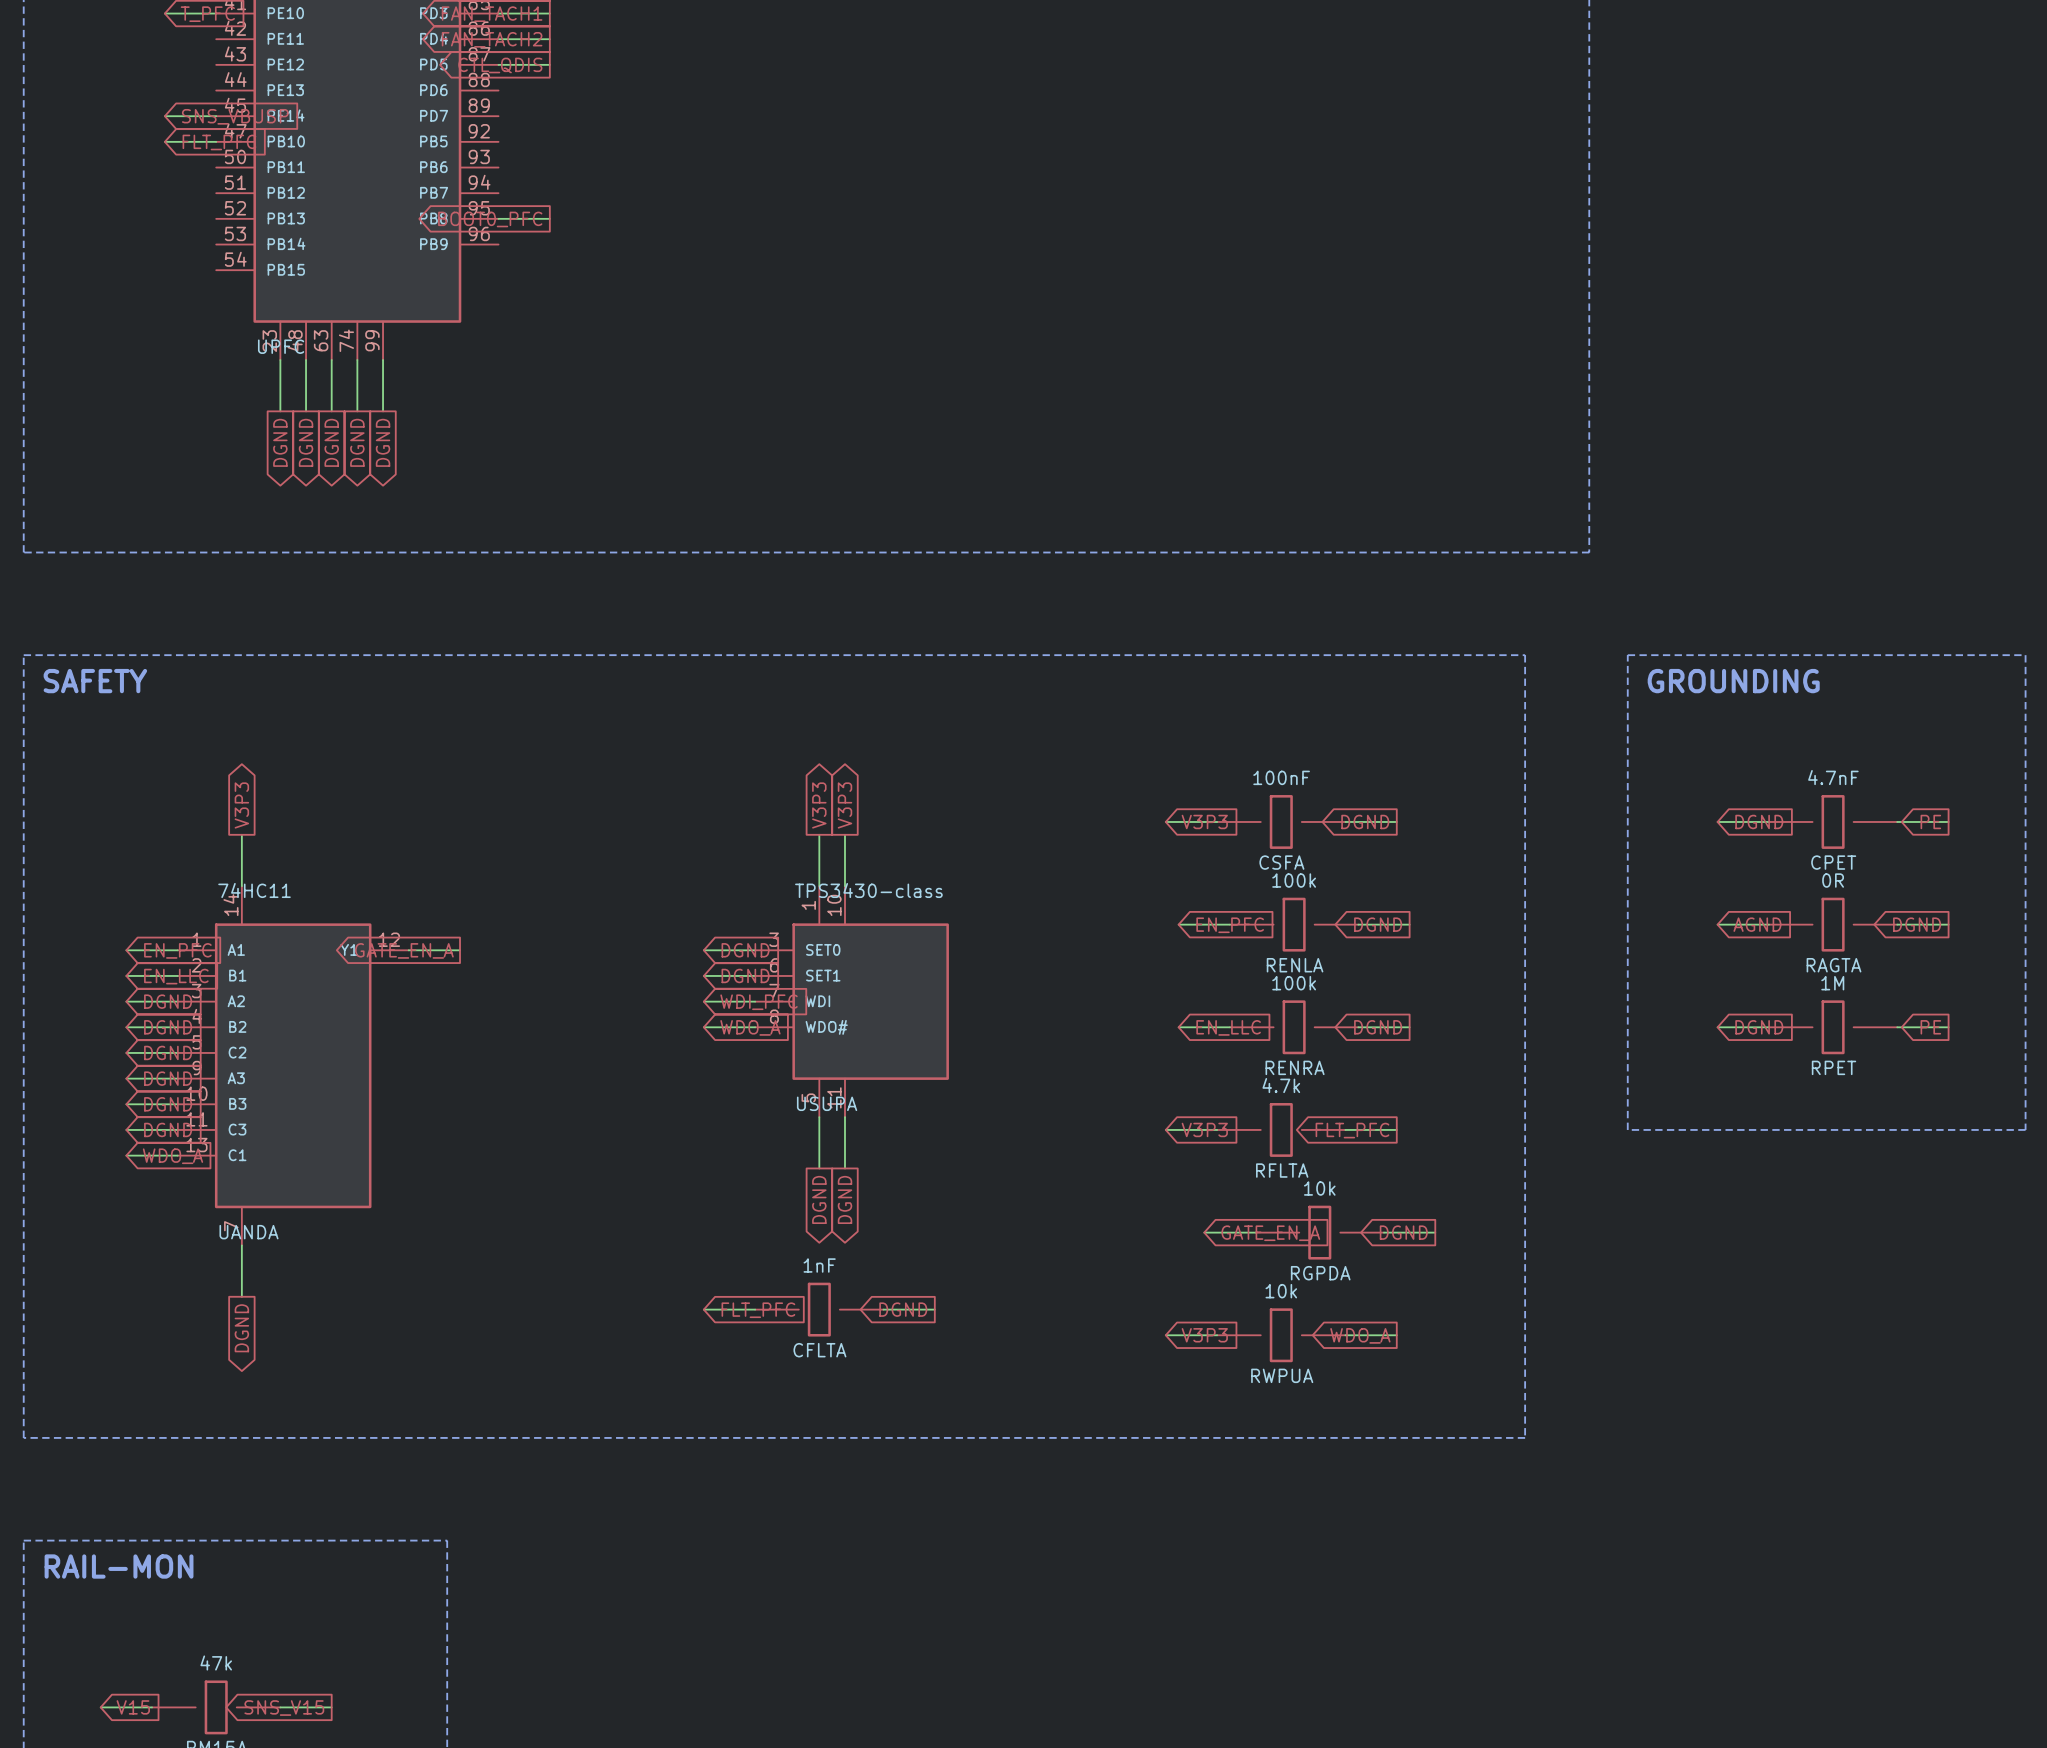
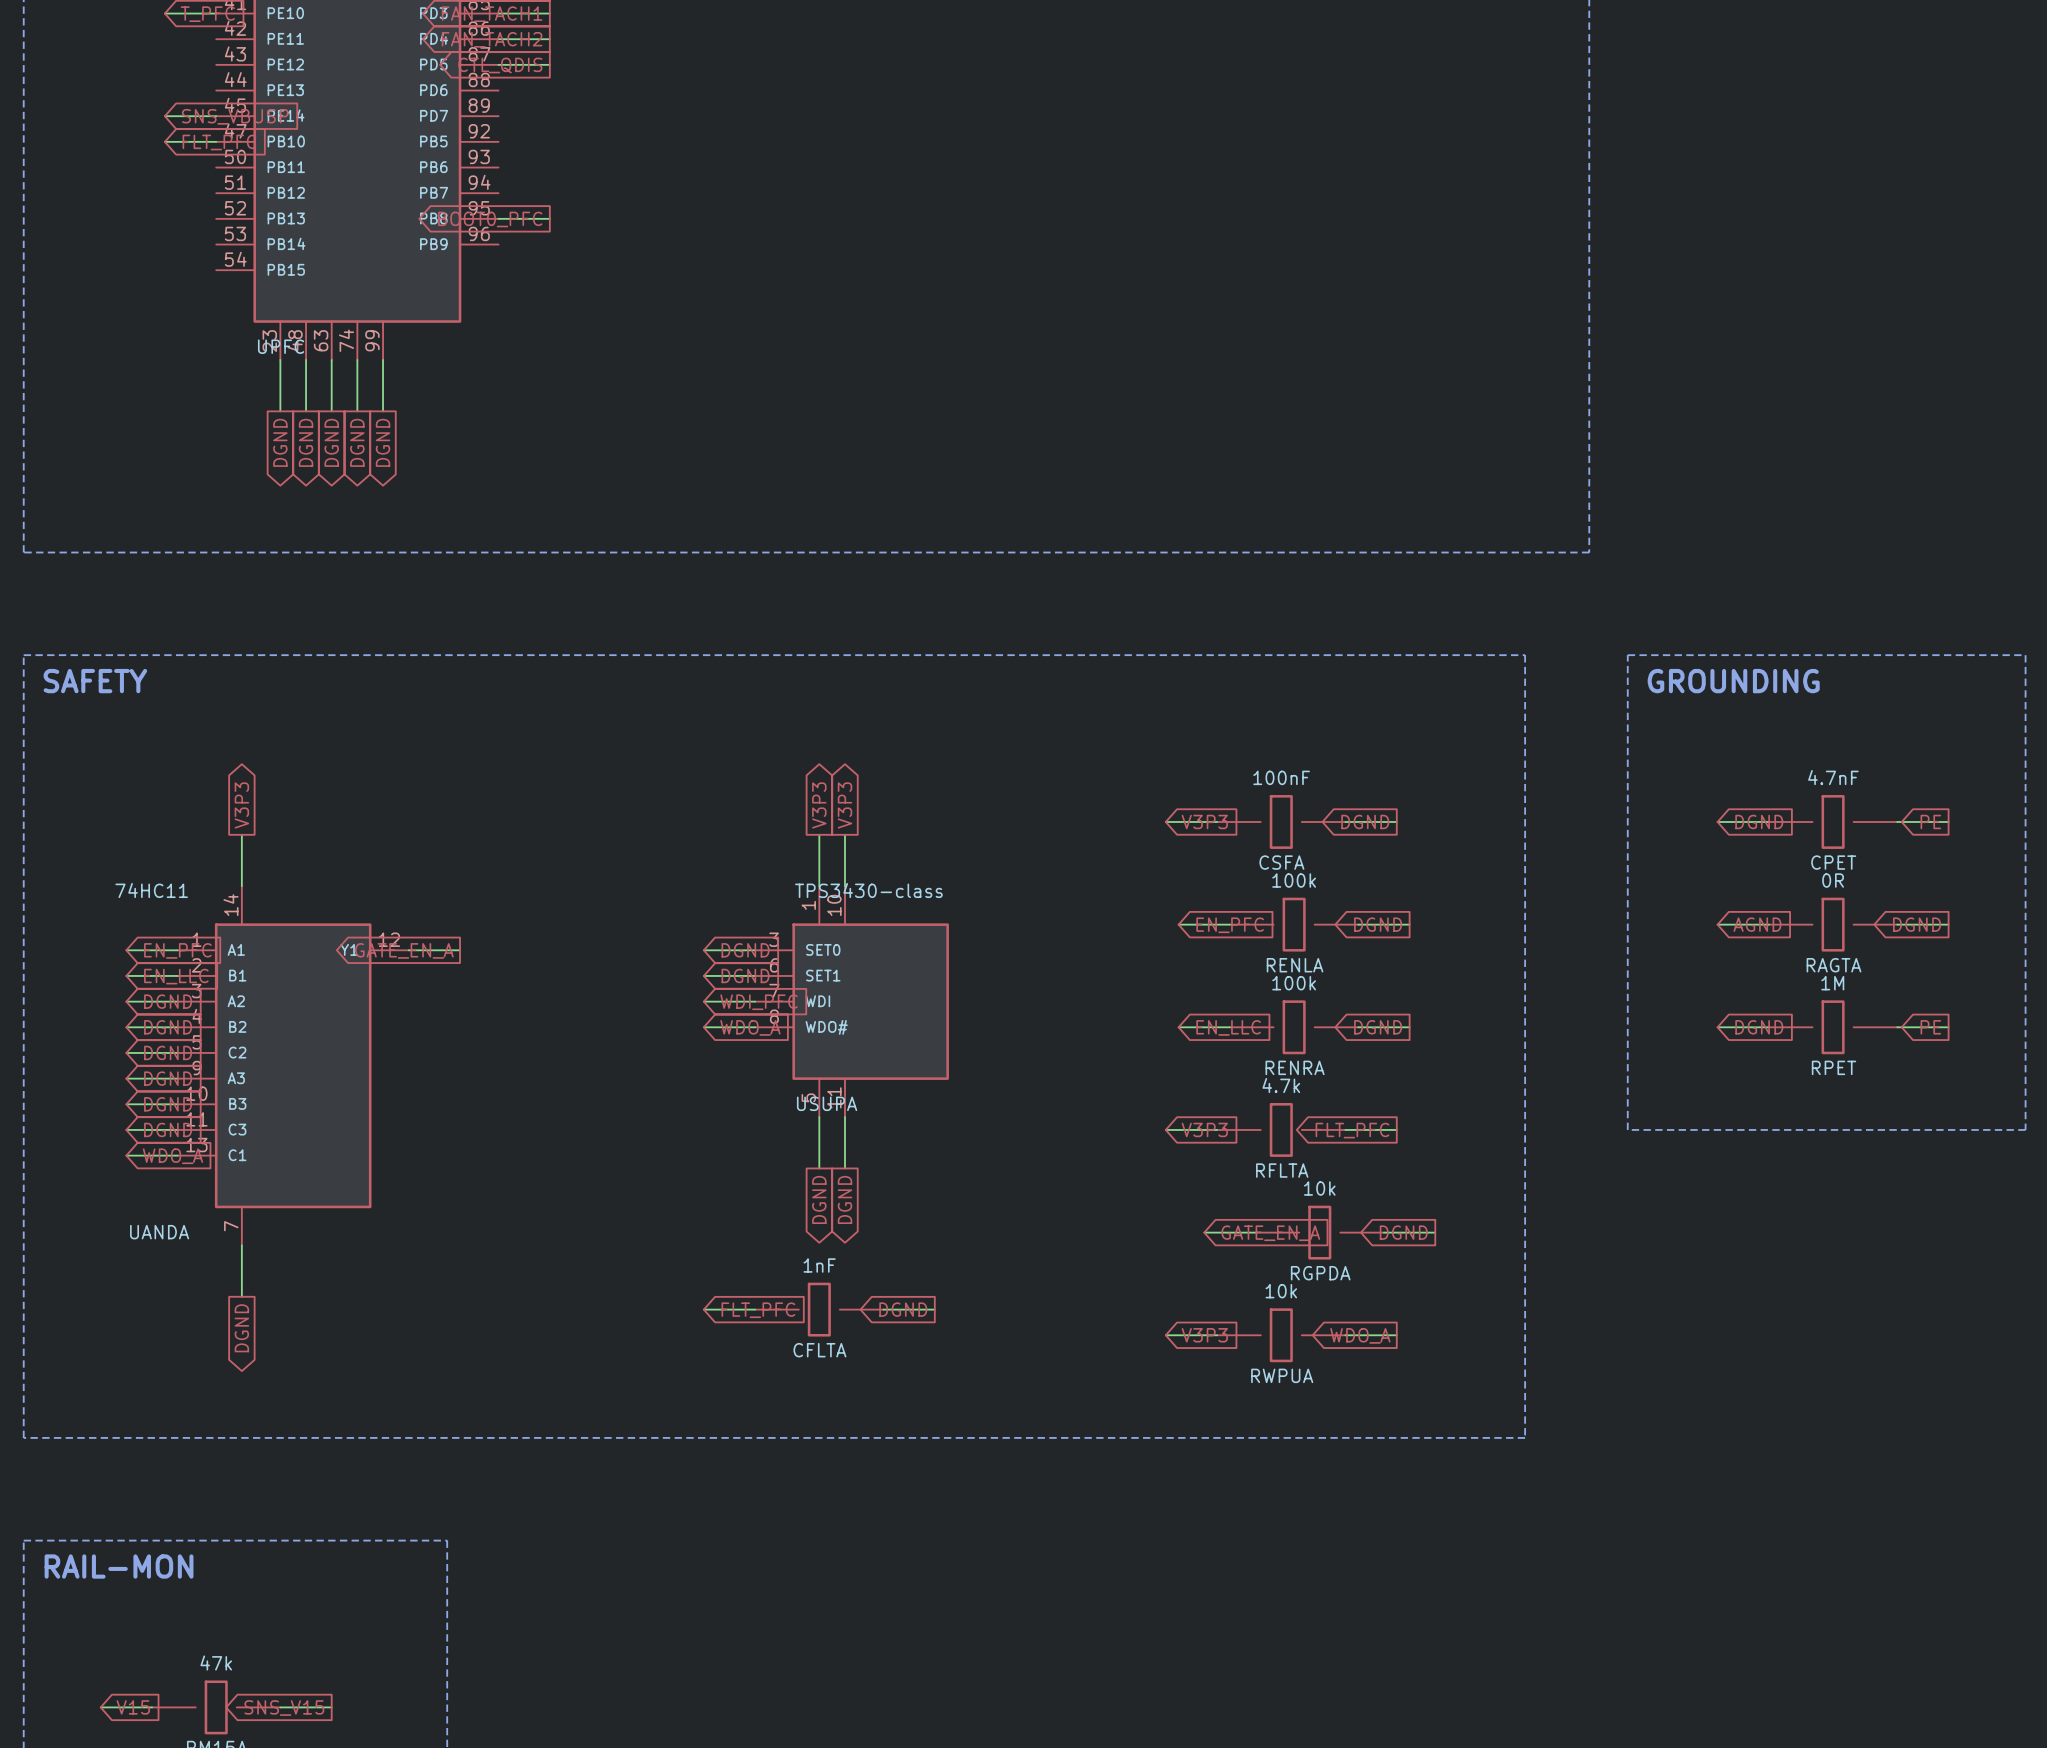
UANDA value position: 74HC11 (254, 890) -> 74HC11 (151, 890)
UANDA name position: UANDA (249, 1232) -> UANDA (159, 1232)

